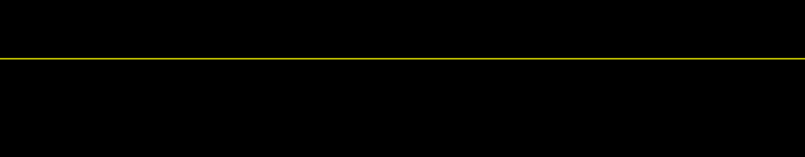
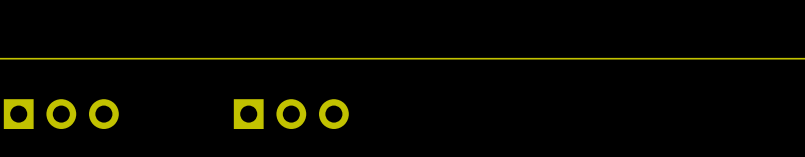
part: none -> (61, 114)
part: none -> (291, 114)

